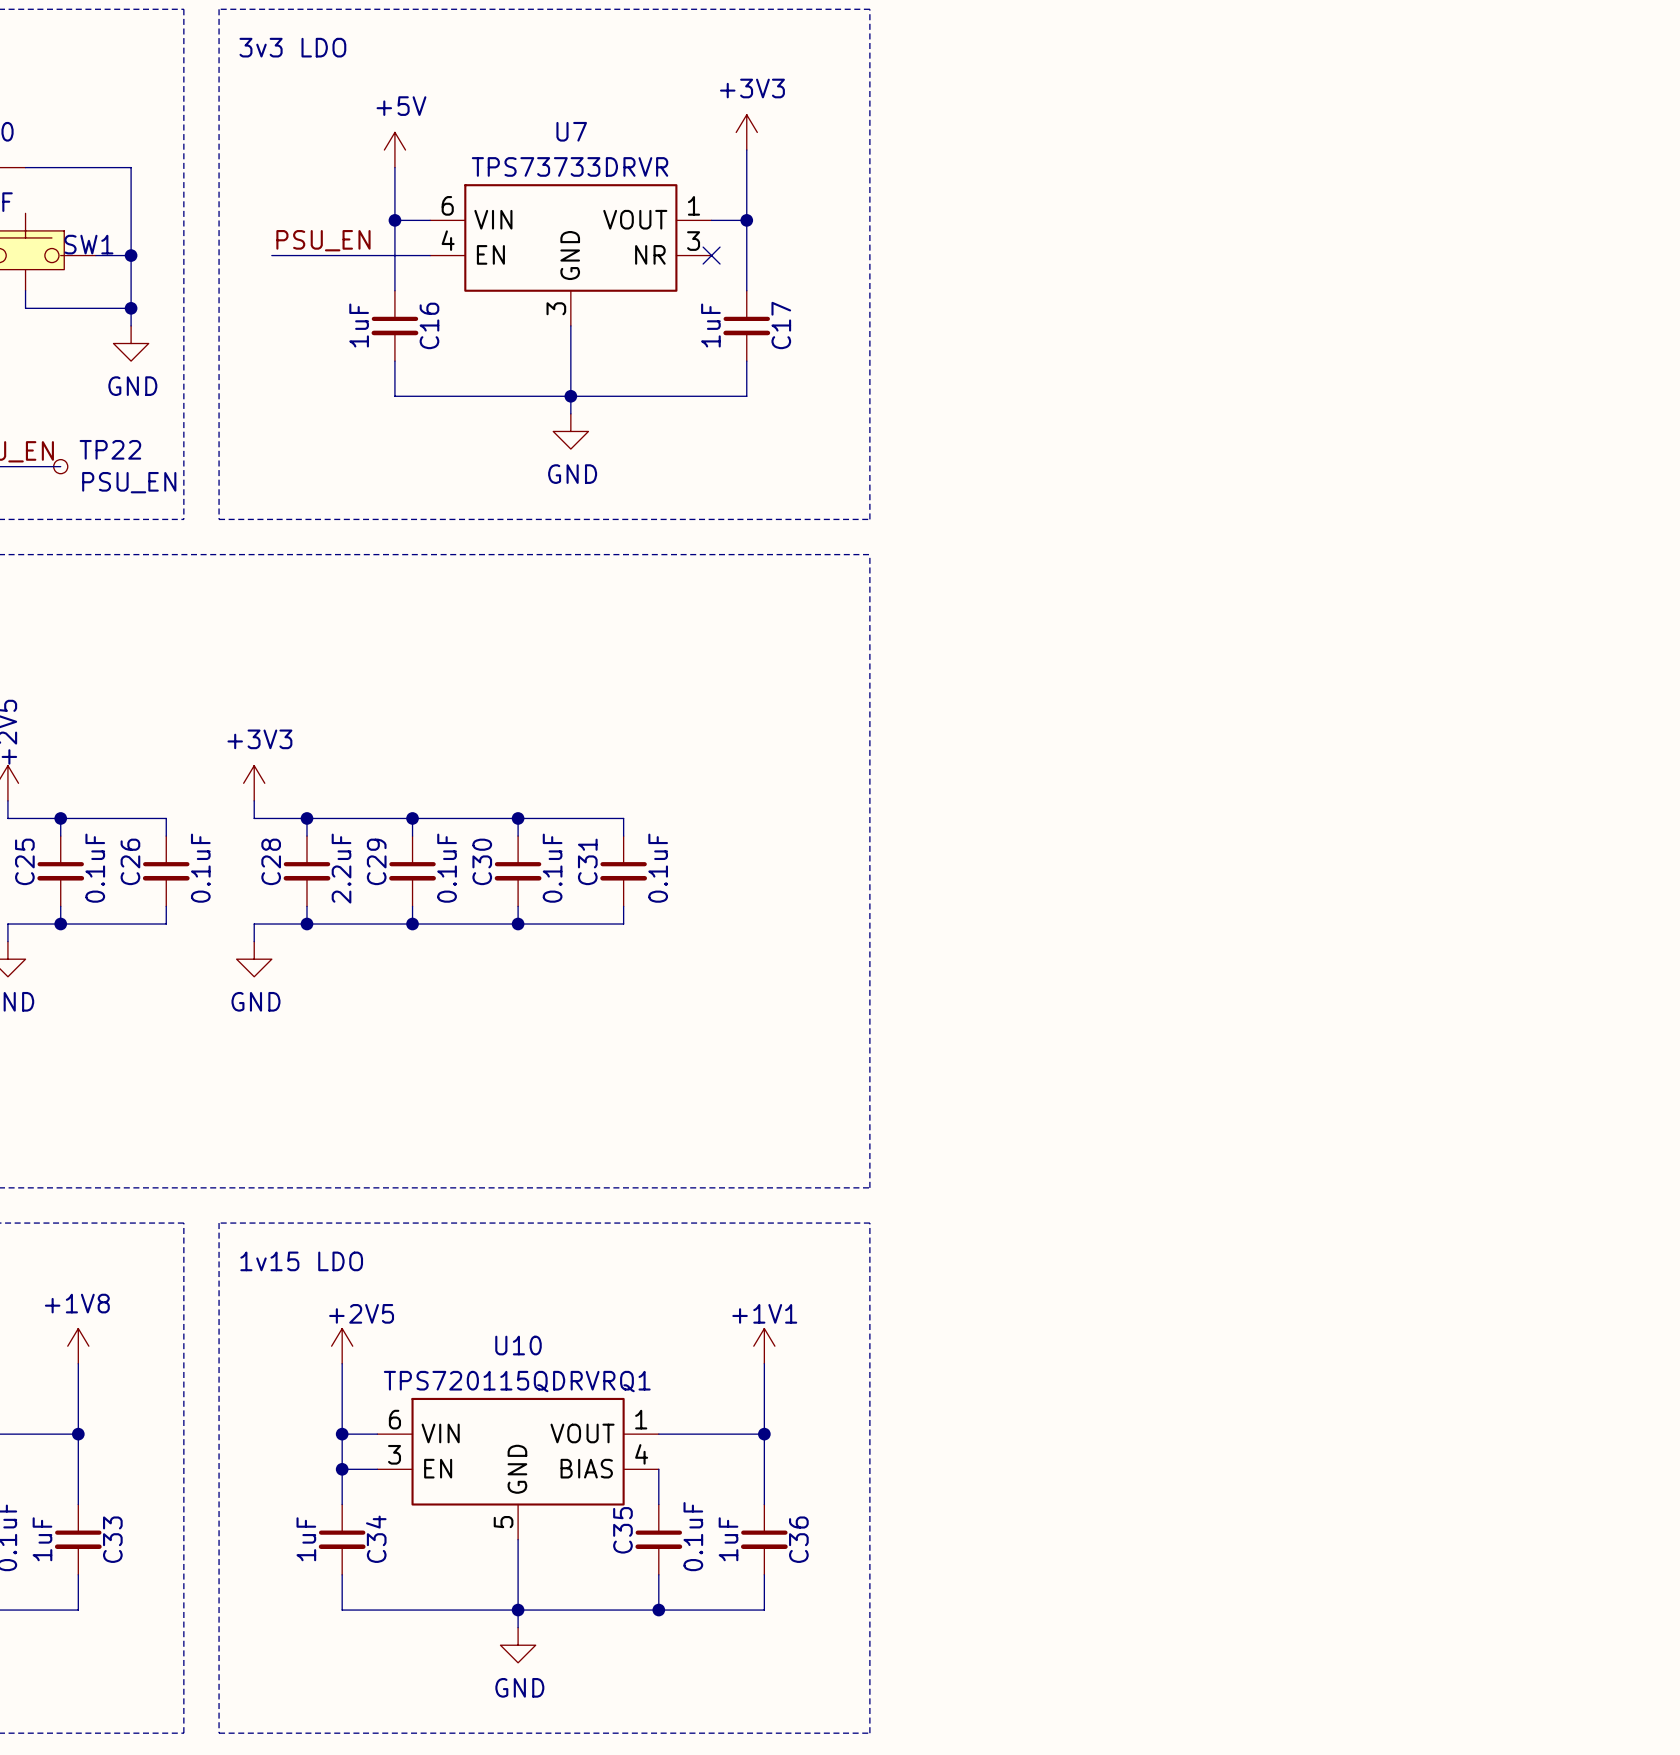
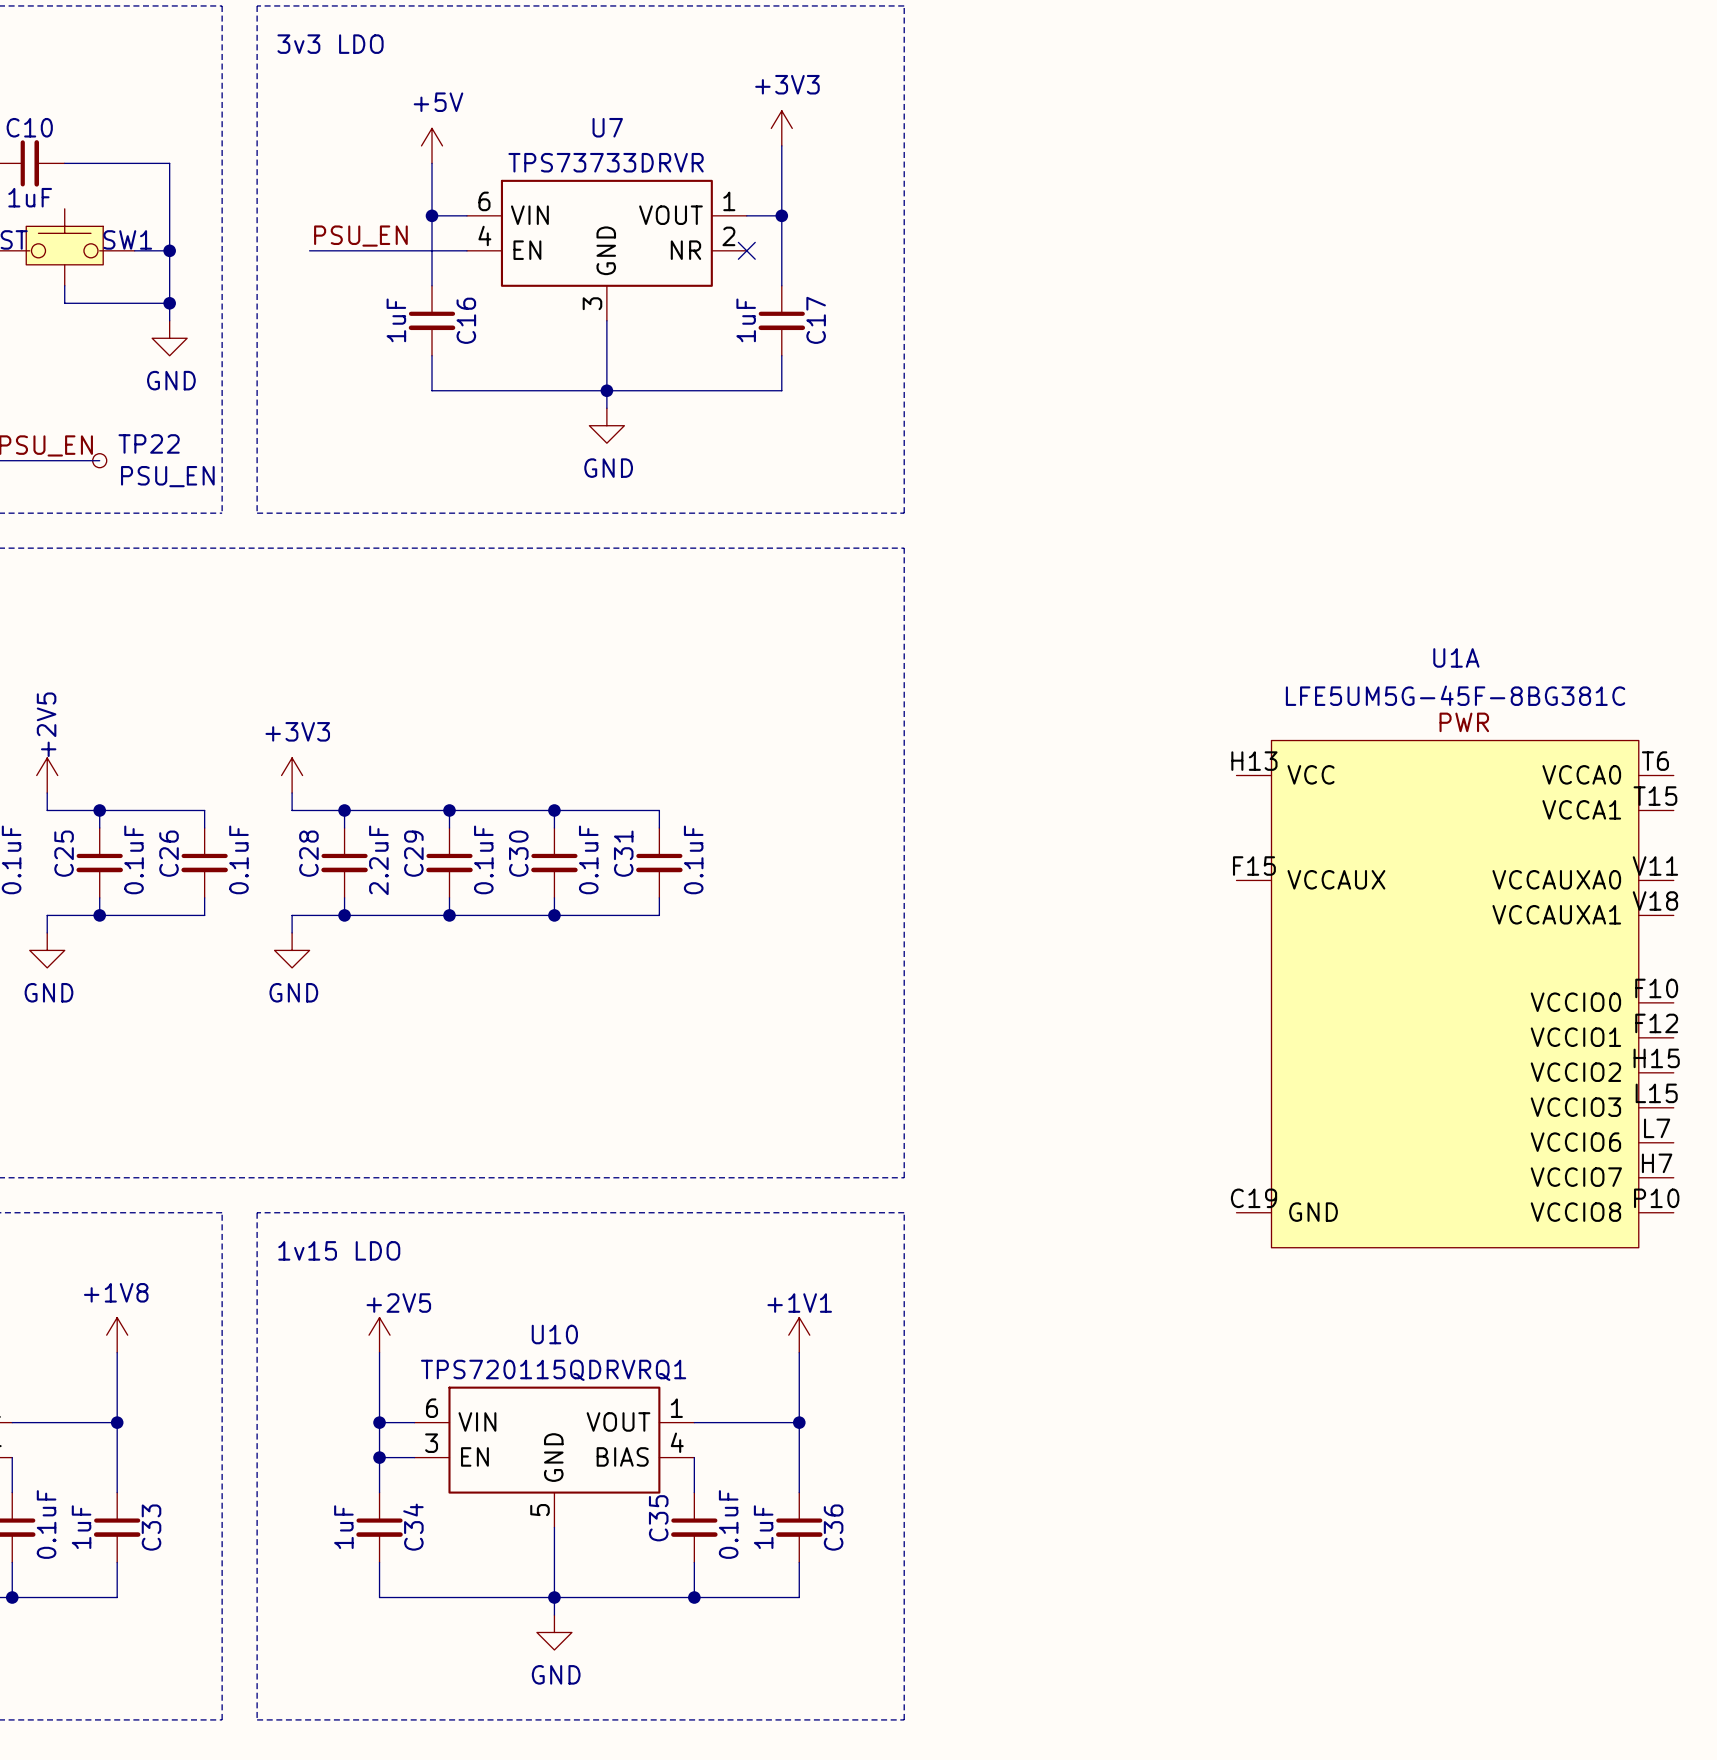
U7 pin number: 3 (693, 241) -> 2 (728, 236)
U1A: none -> LFE5UM5G-45F-8BG381C (1455, 994)

